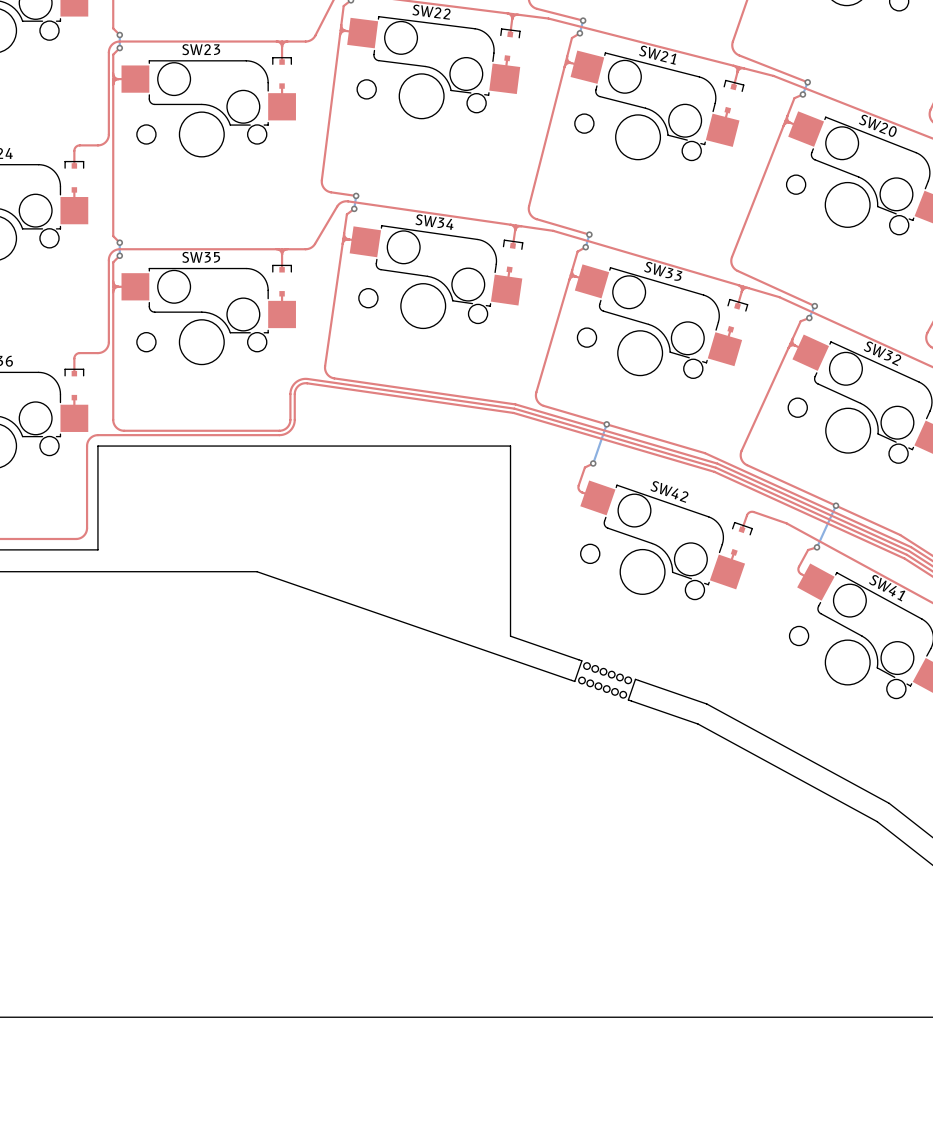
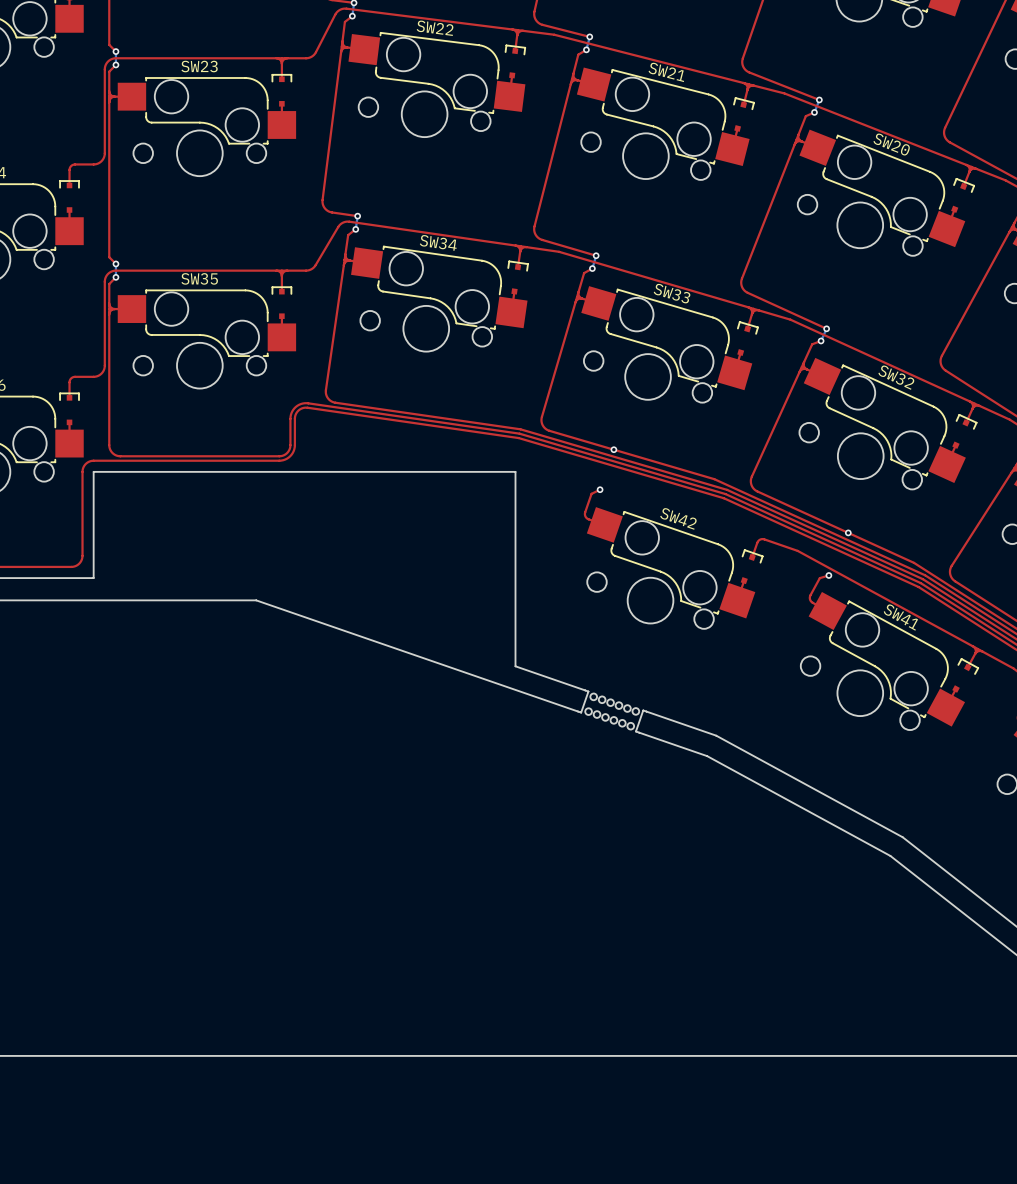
bottom track: (606, 424) (593, 463) -> none
bottom track: (836, 505) (817, 547) -> none

